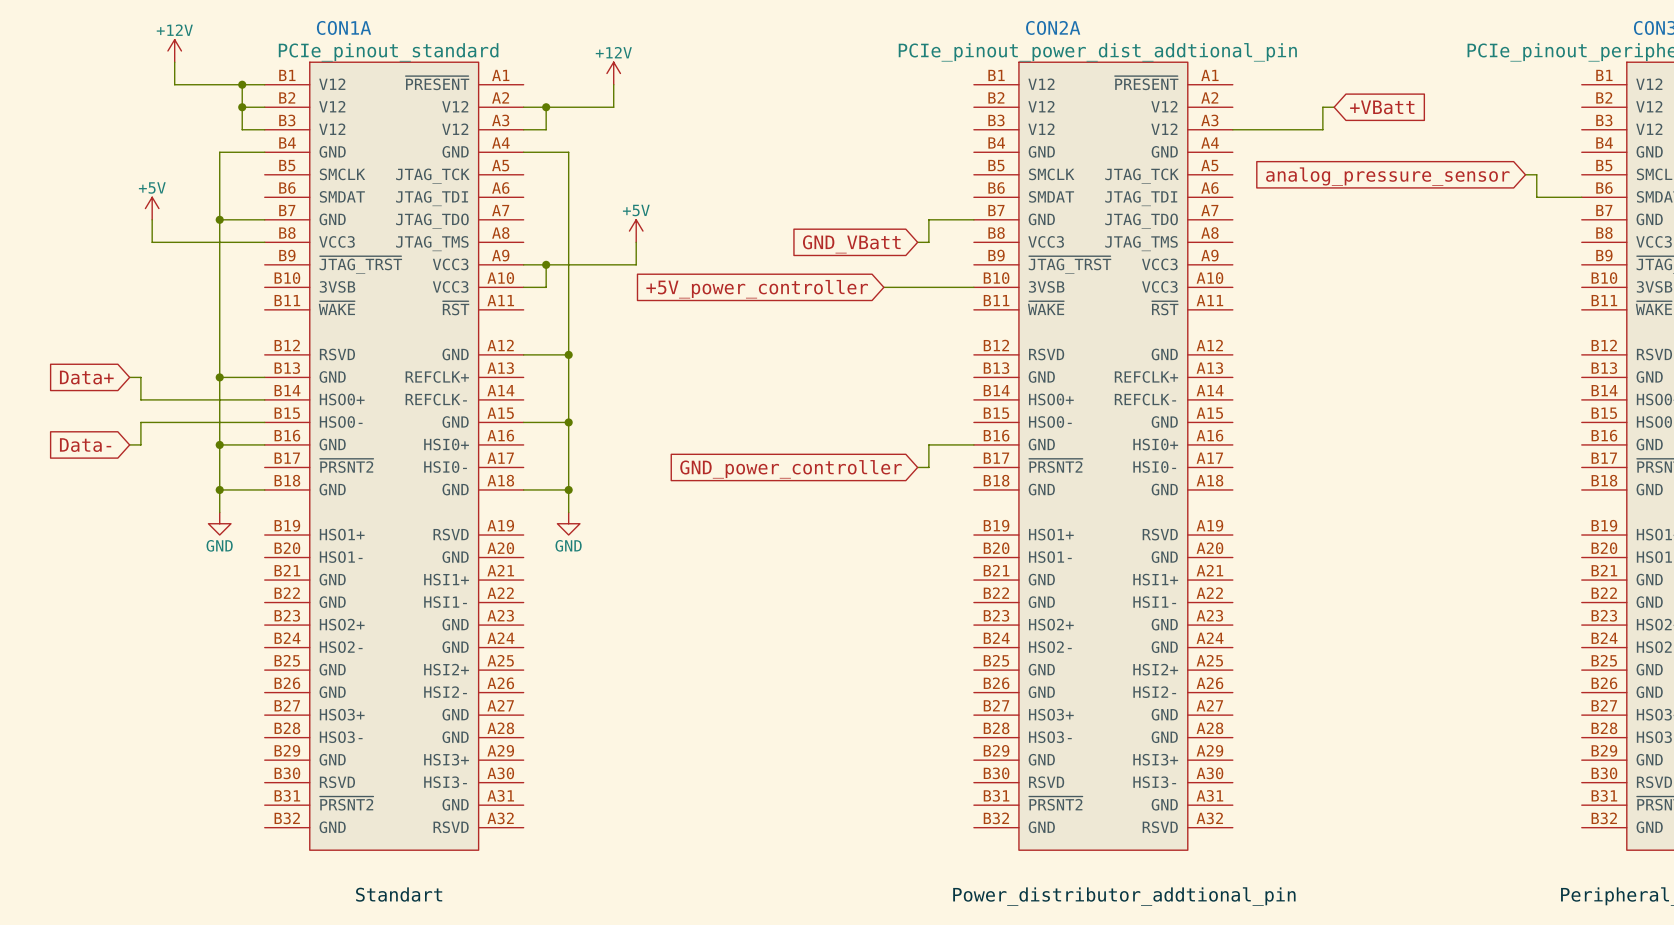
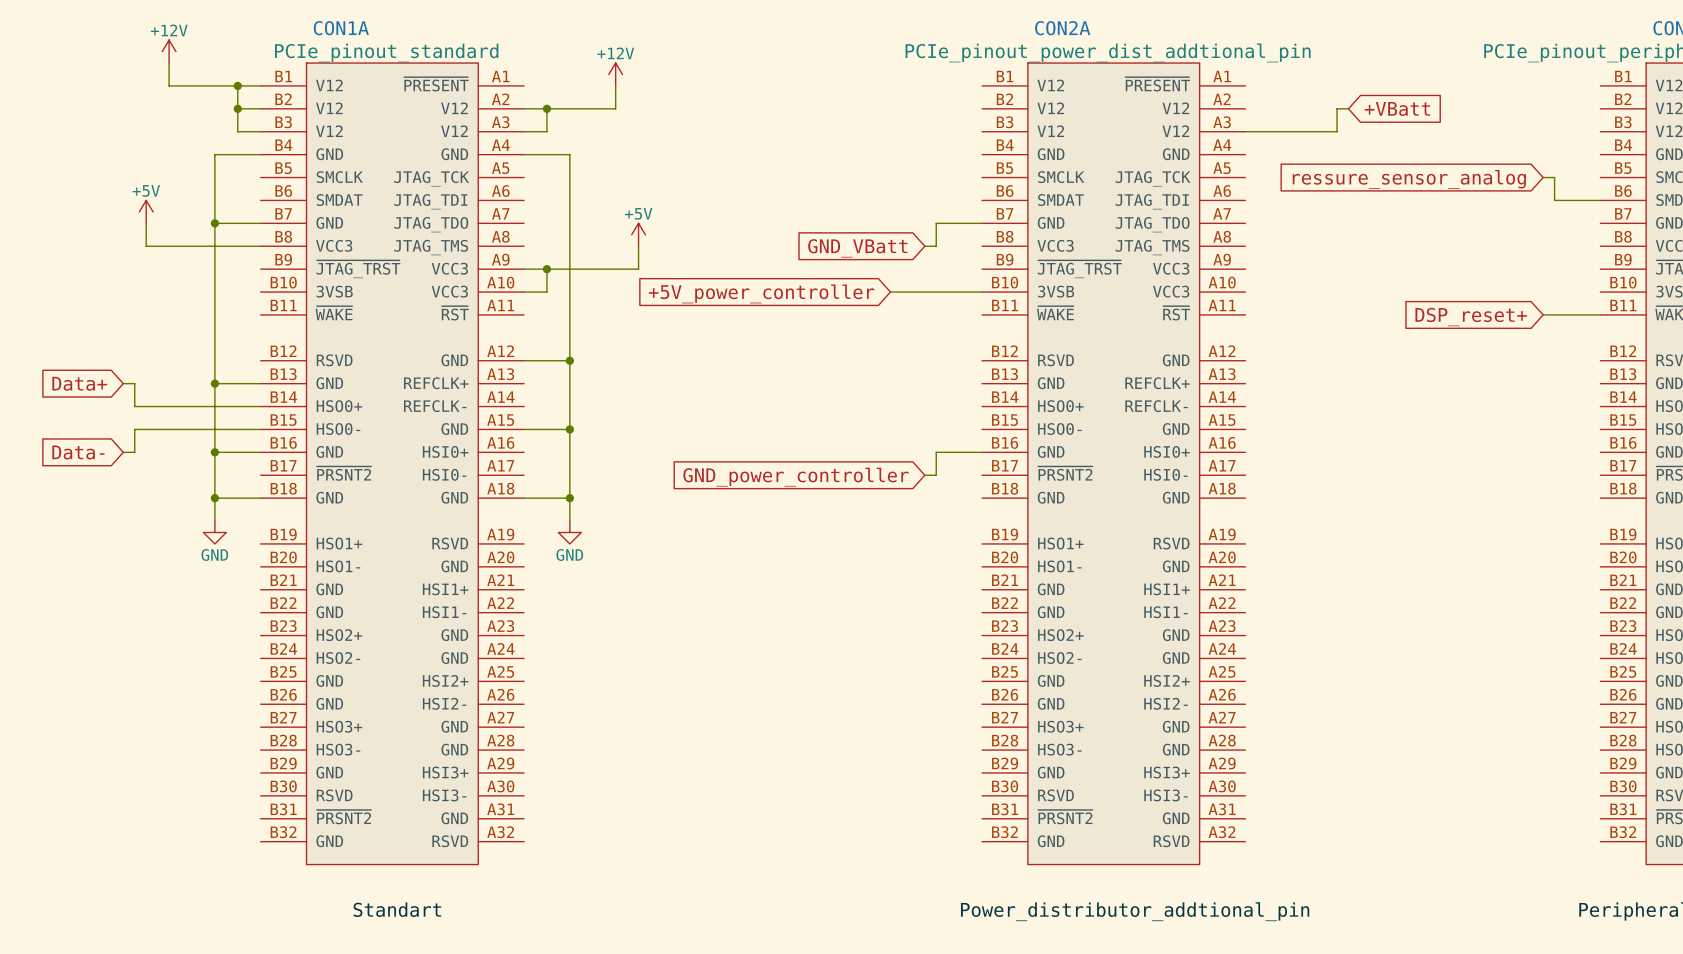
global label: analog_pressure_sensor (1387, 176) -> ressure_sensor_analog (1409, 179)
wire: none -> (1543, 314) (1600, 314)
global label: none -> DSP_reset+ (1471, 317)

